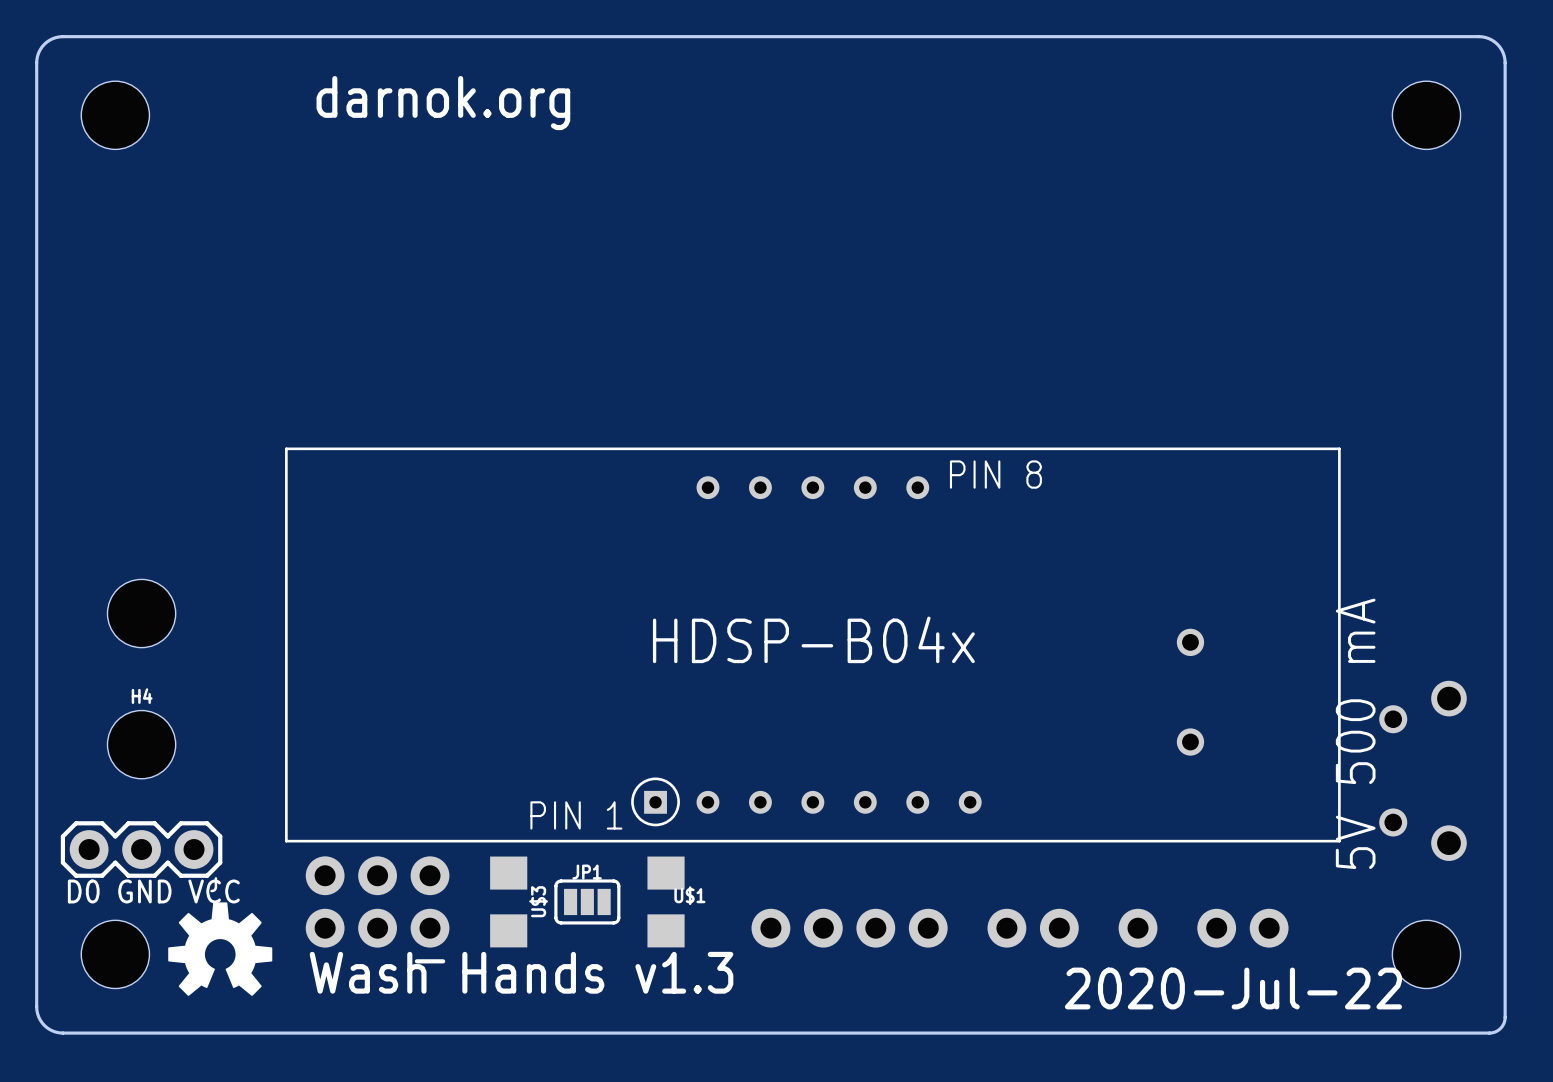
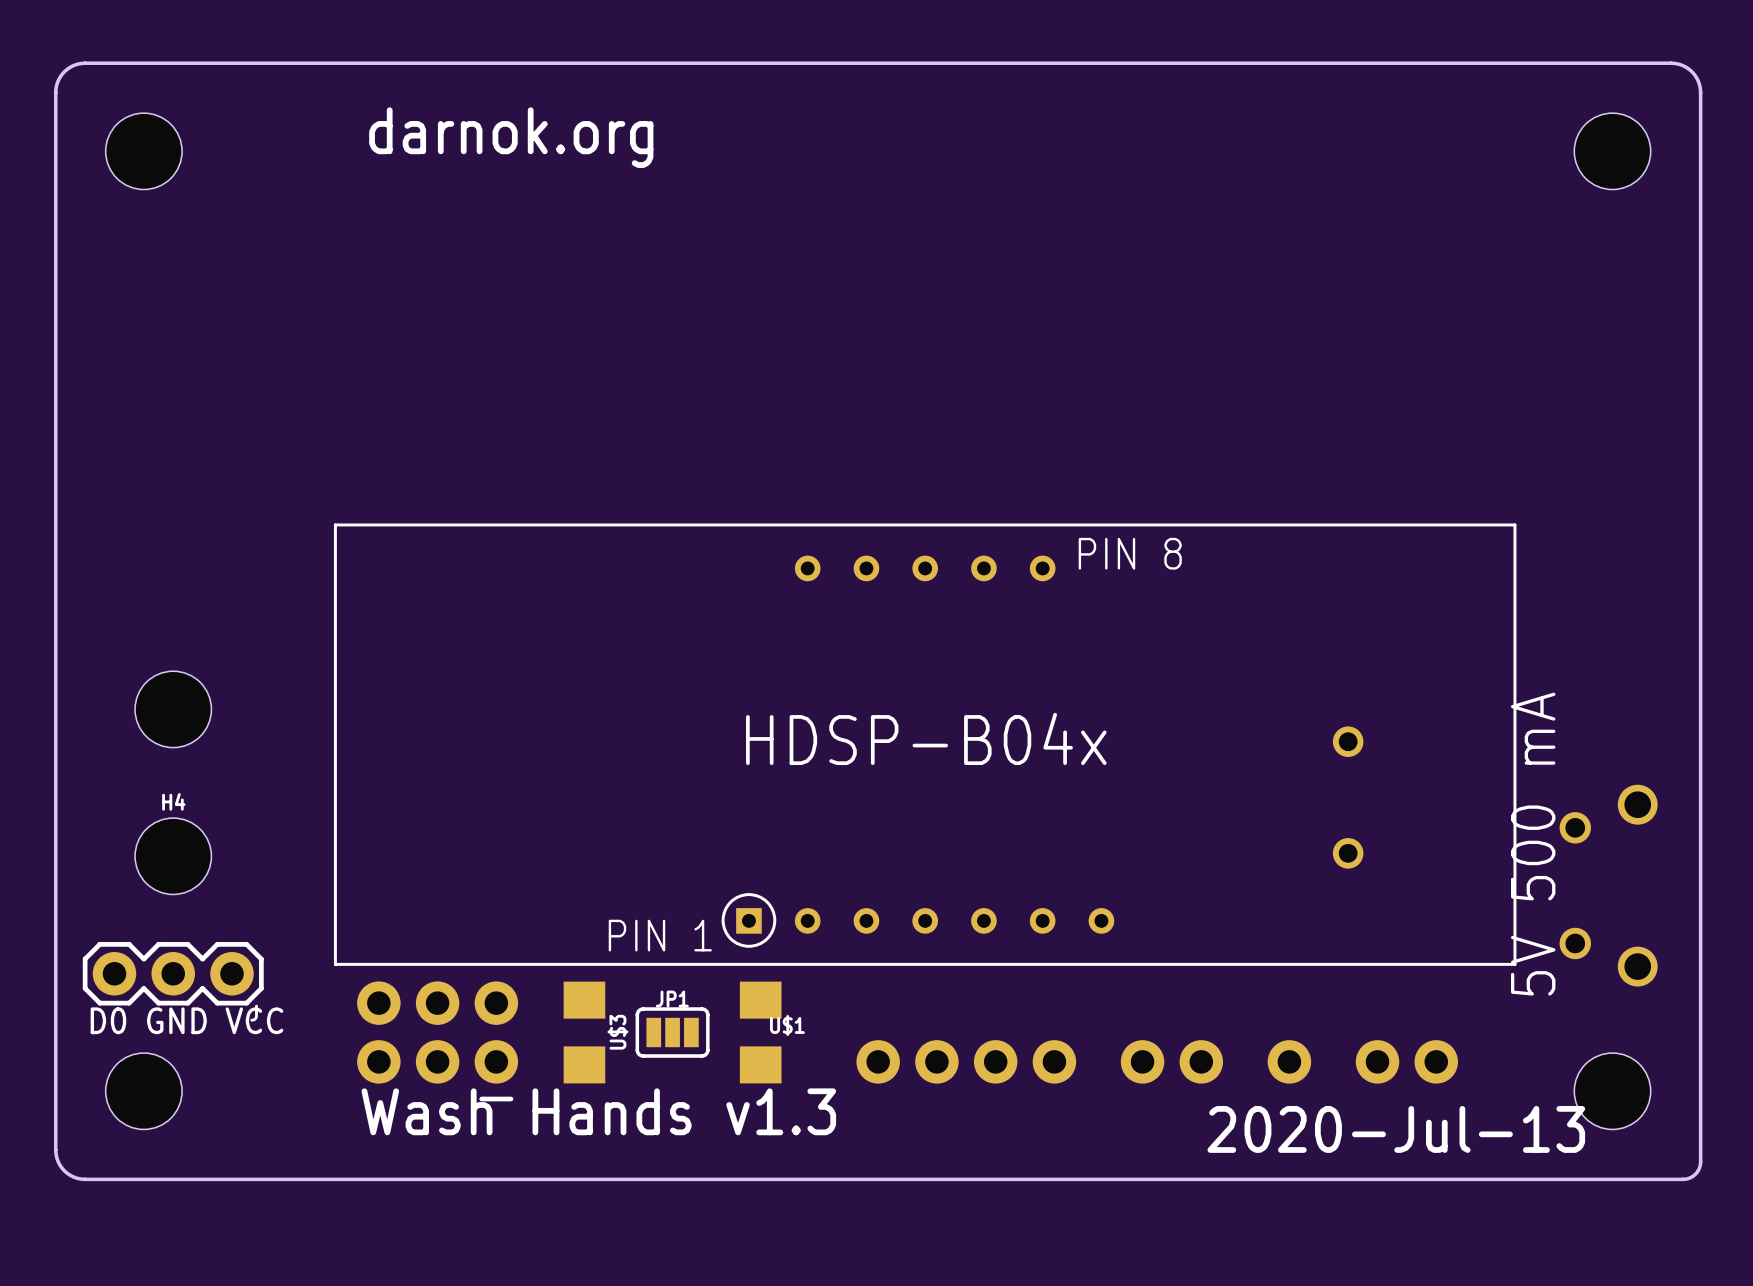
drawing: [168, 902, 273, 996] -> none
text: 2020-Jul-22 (1233, 988) -> 2020-Jul-13 (1396, 1129)

